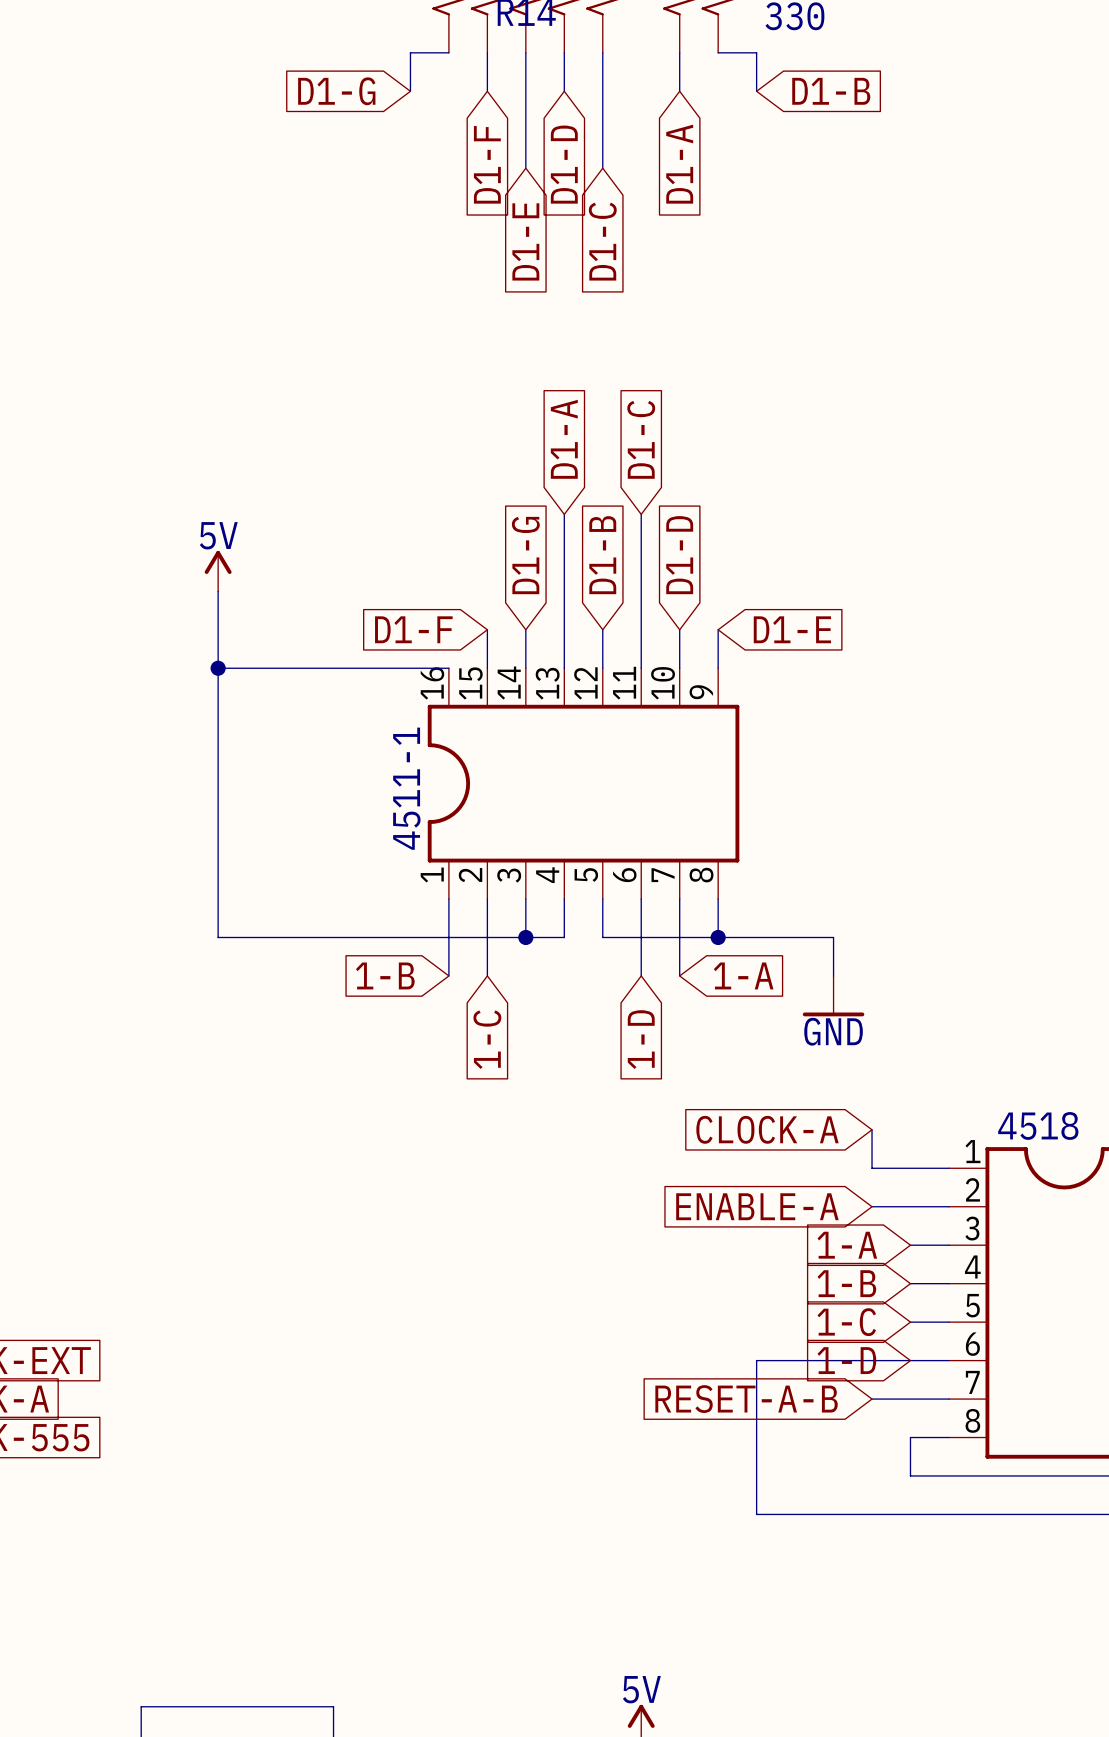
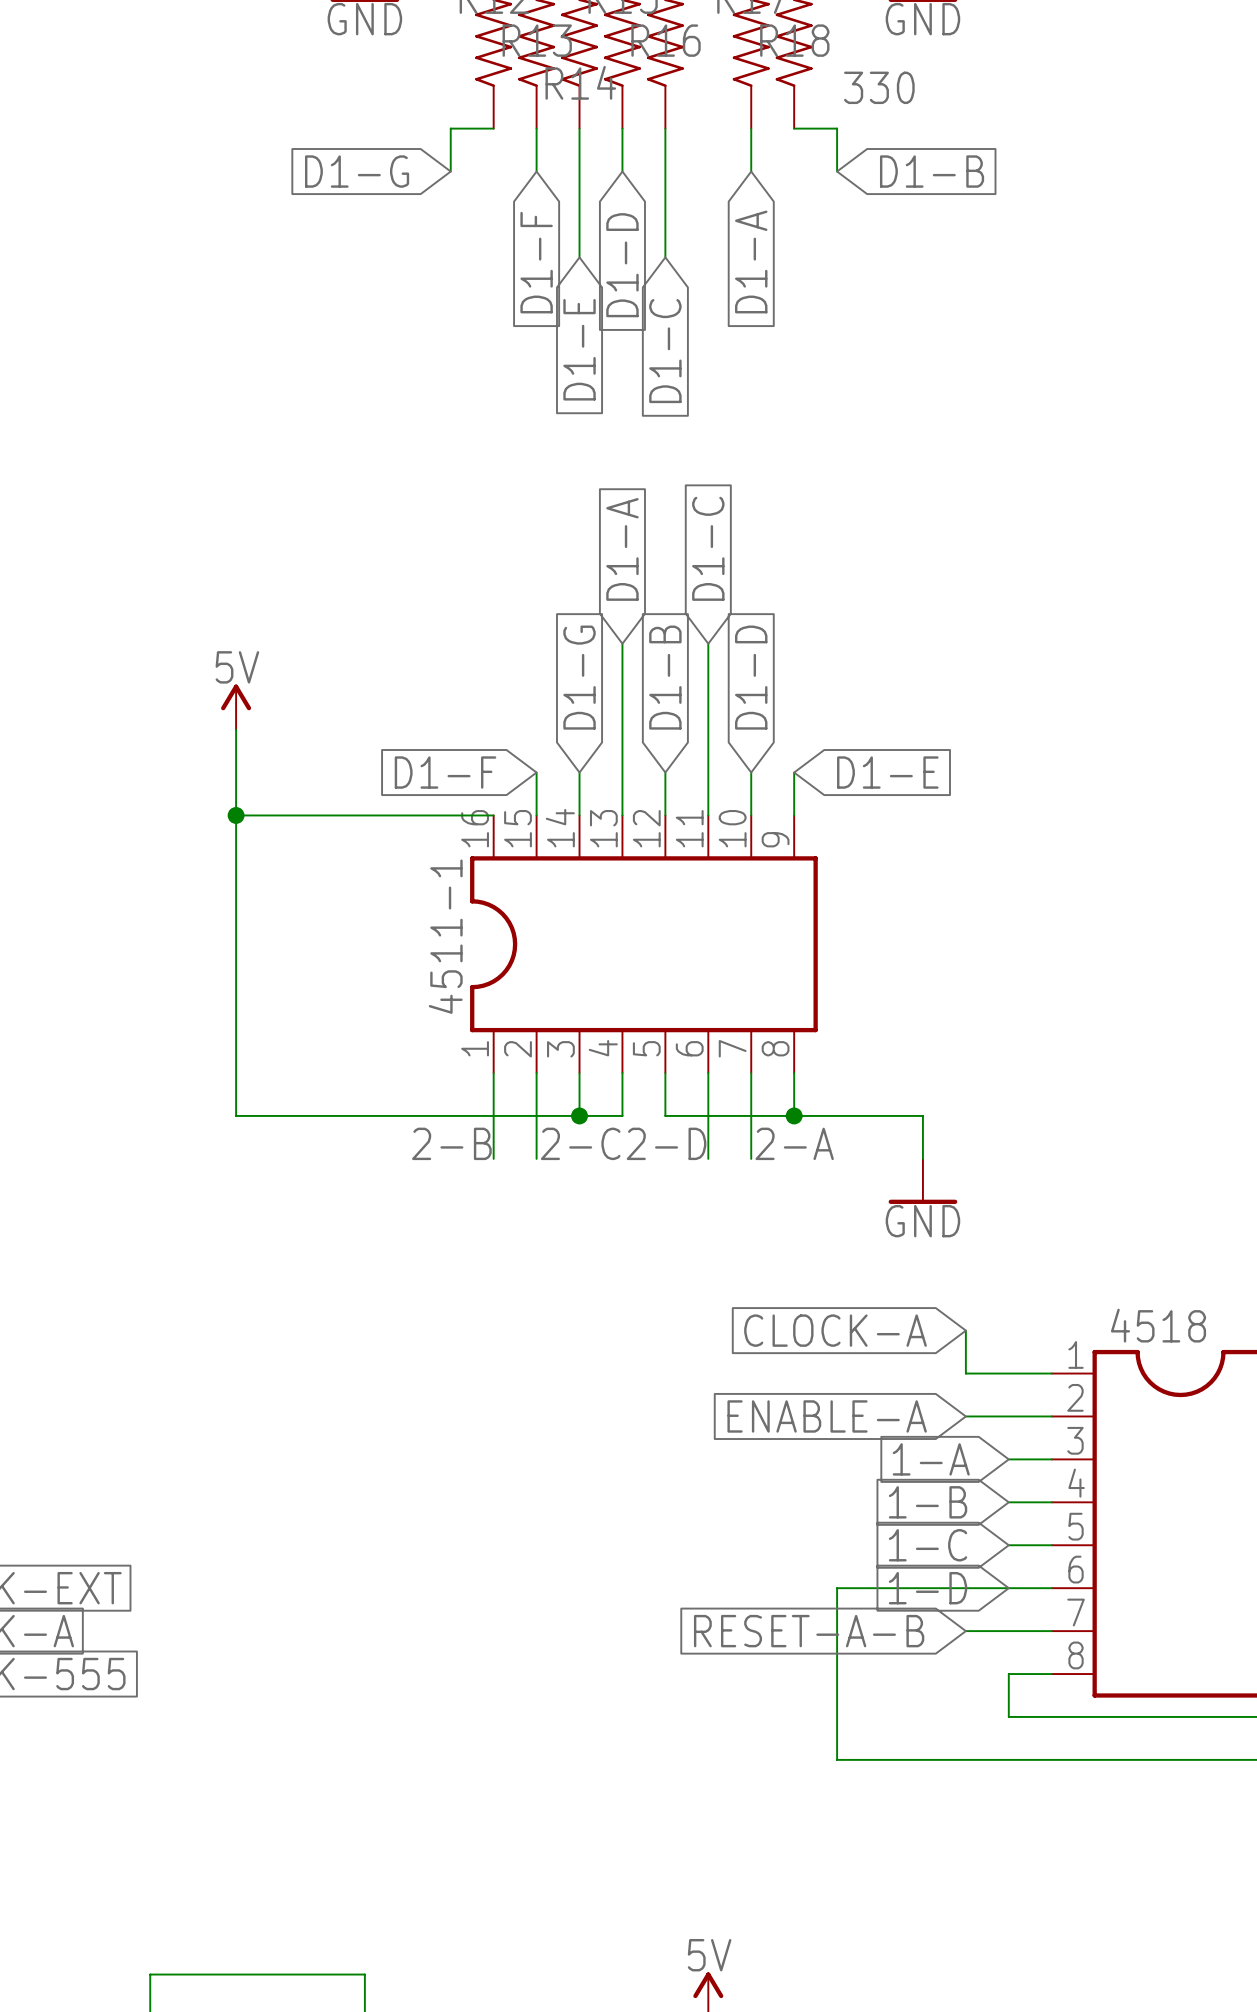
label: none -> 2-B (451, 1143)
label: none -> 2-C (580, 1143)
label: none -> 2-D (666, 1143)
label: none -> 2-A (794, 1143)
global label: 1-B (385, 975) -> none
global label: 1-A (743, 975) -> none
global label: 1-C (487, 1039) -> none
global label: 1-D (641, 1039) -> none

